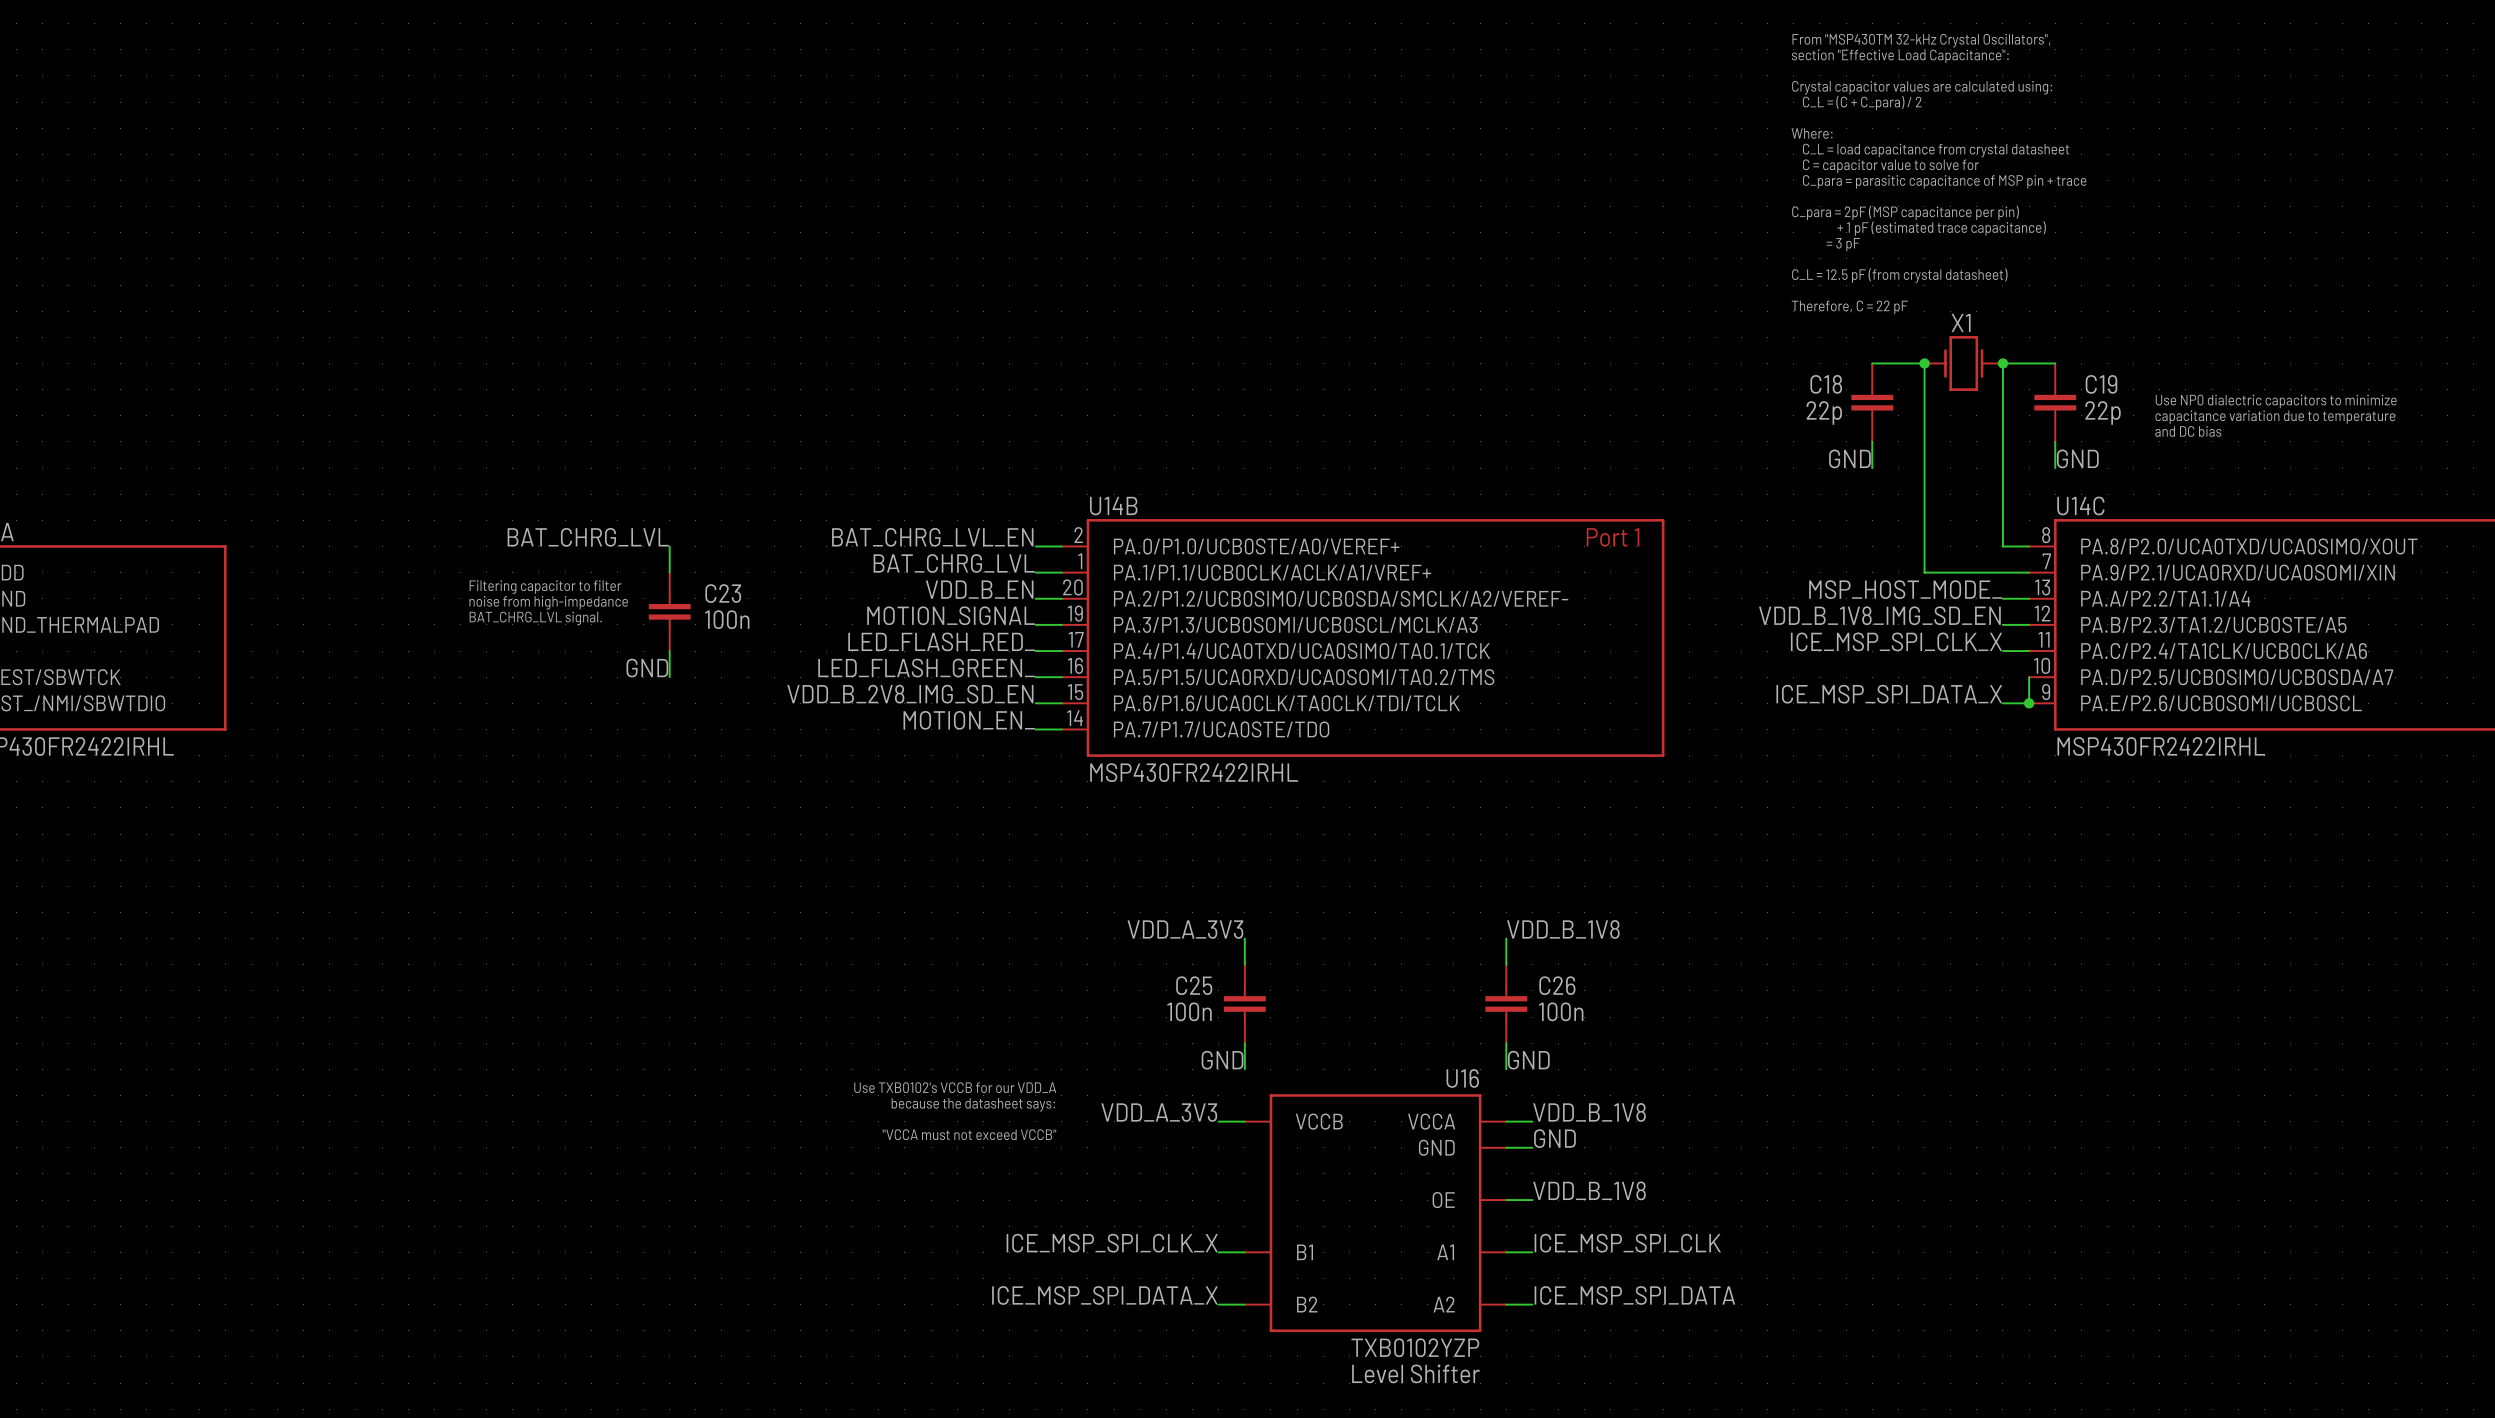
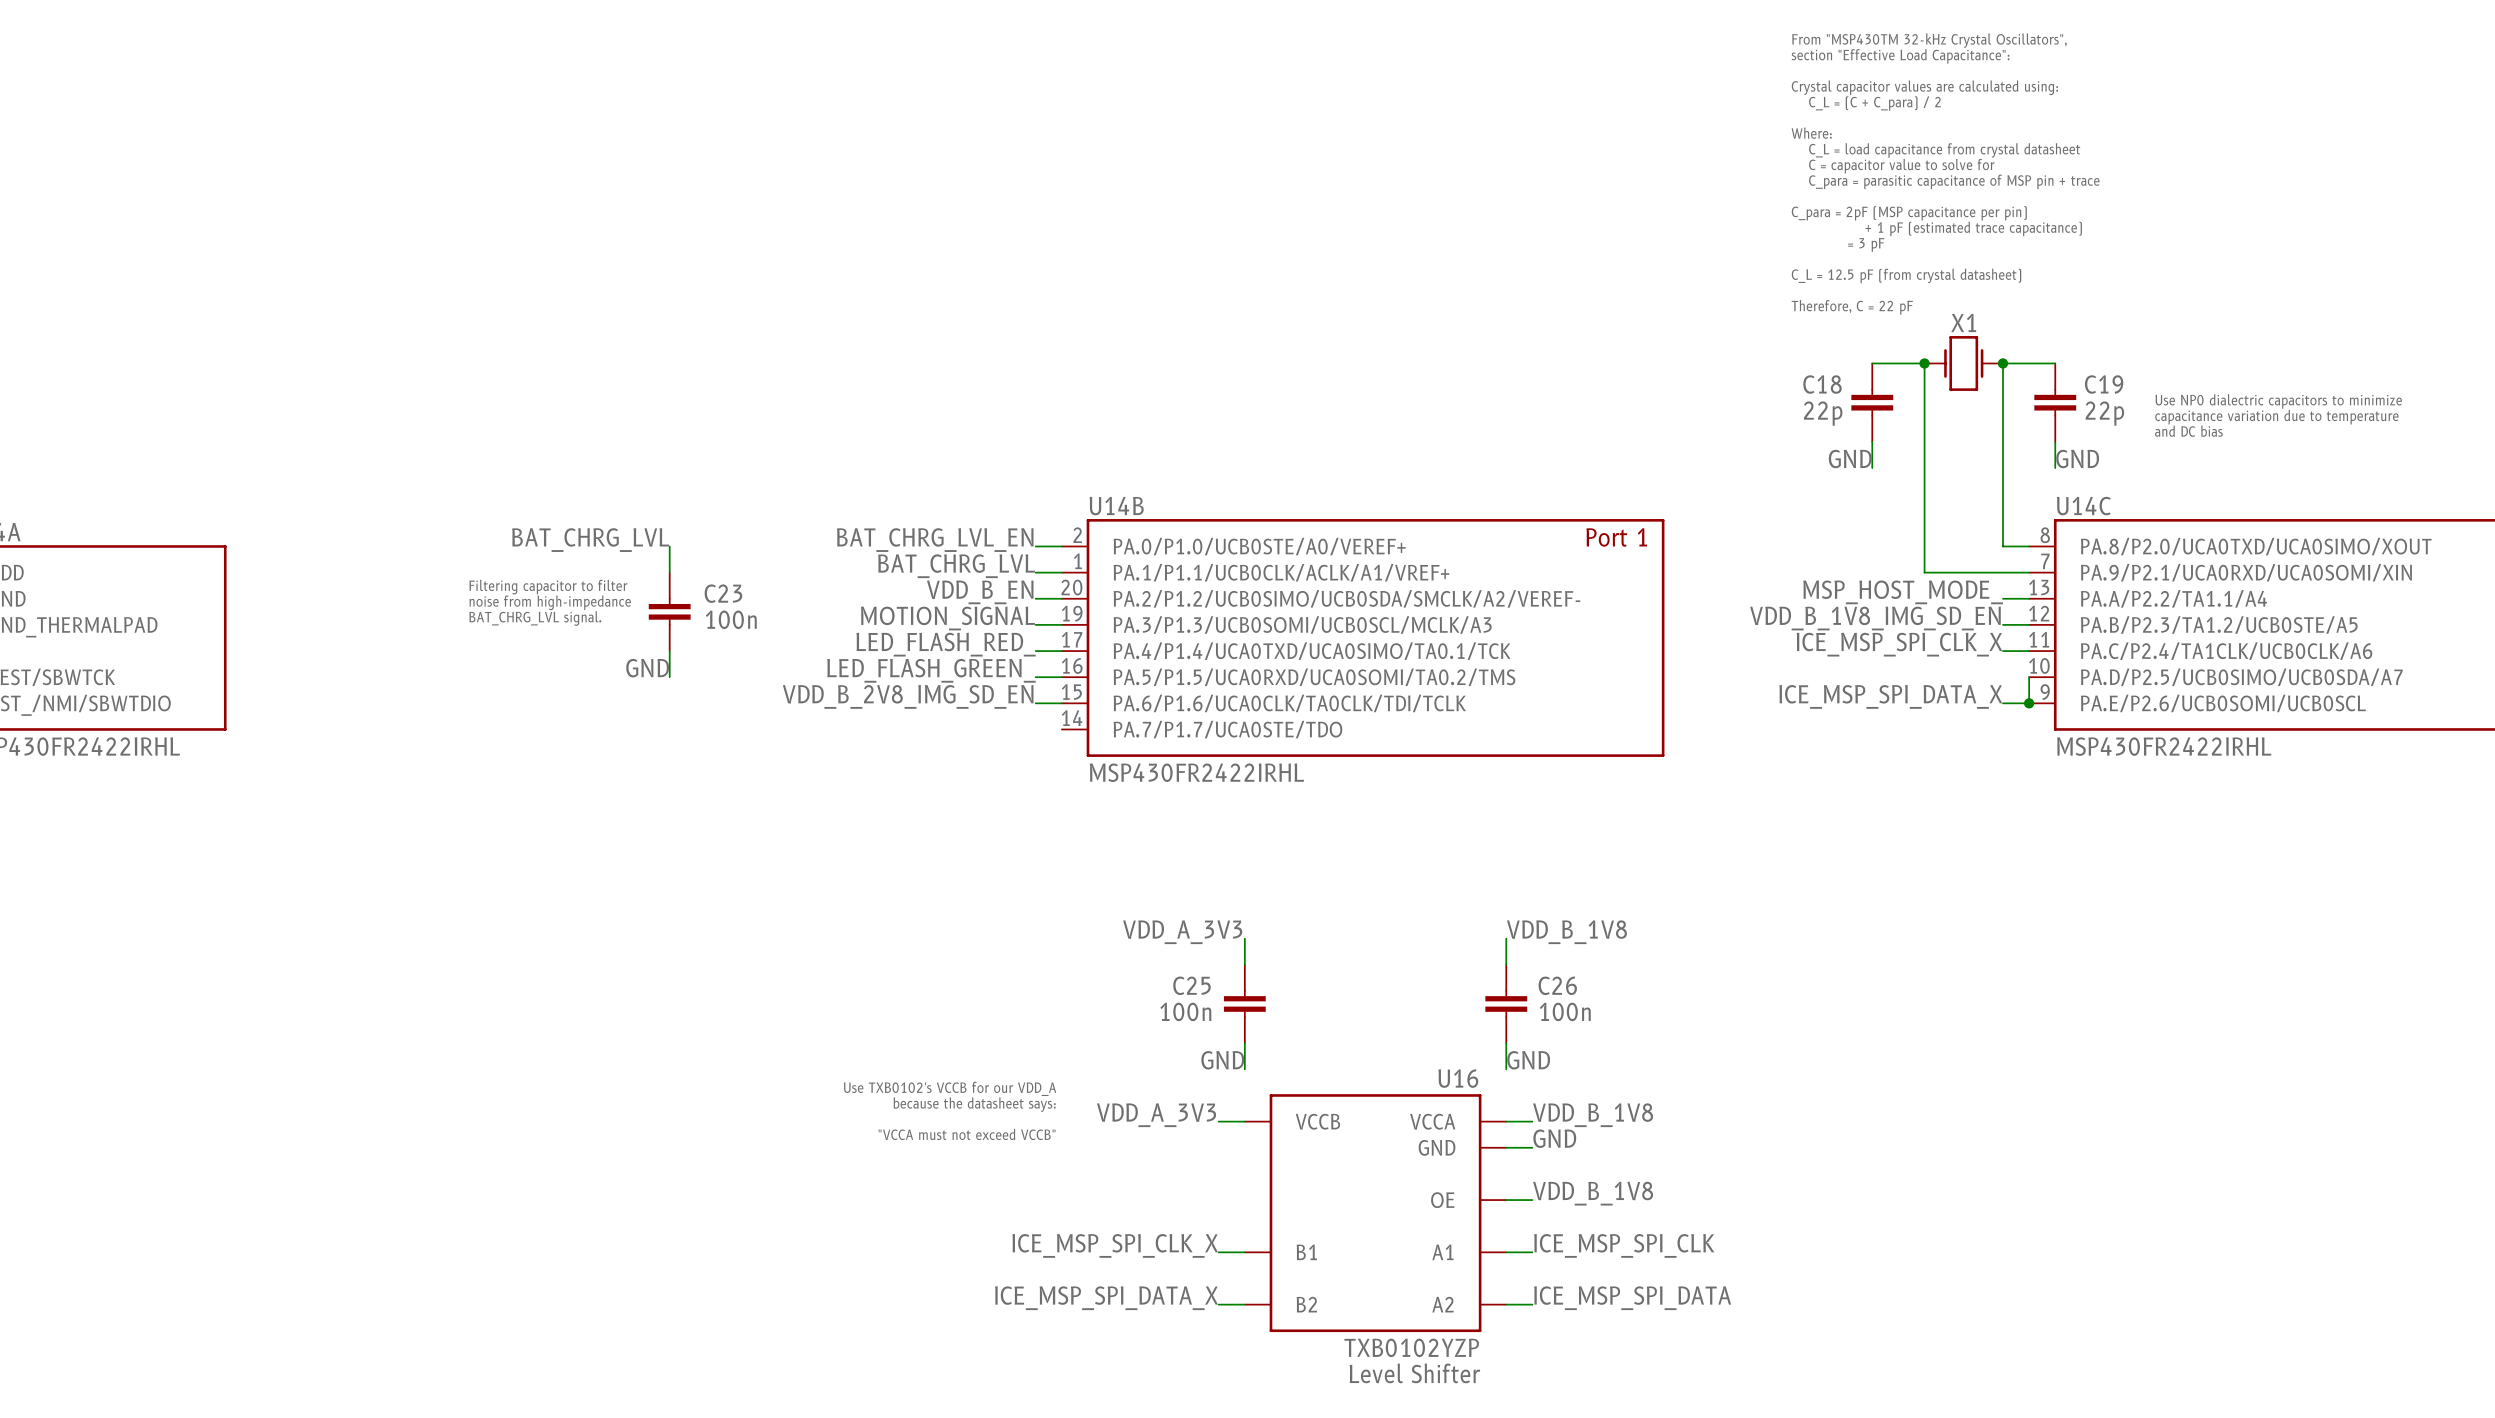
label: MOTION_EN_ (969, 720) -> none
wire: (1035, 729) (1061, 729) -> none

